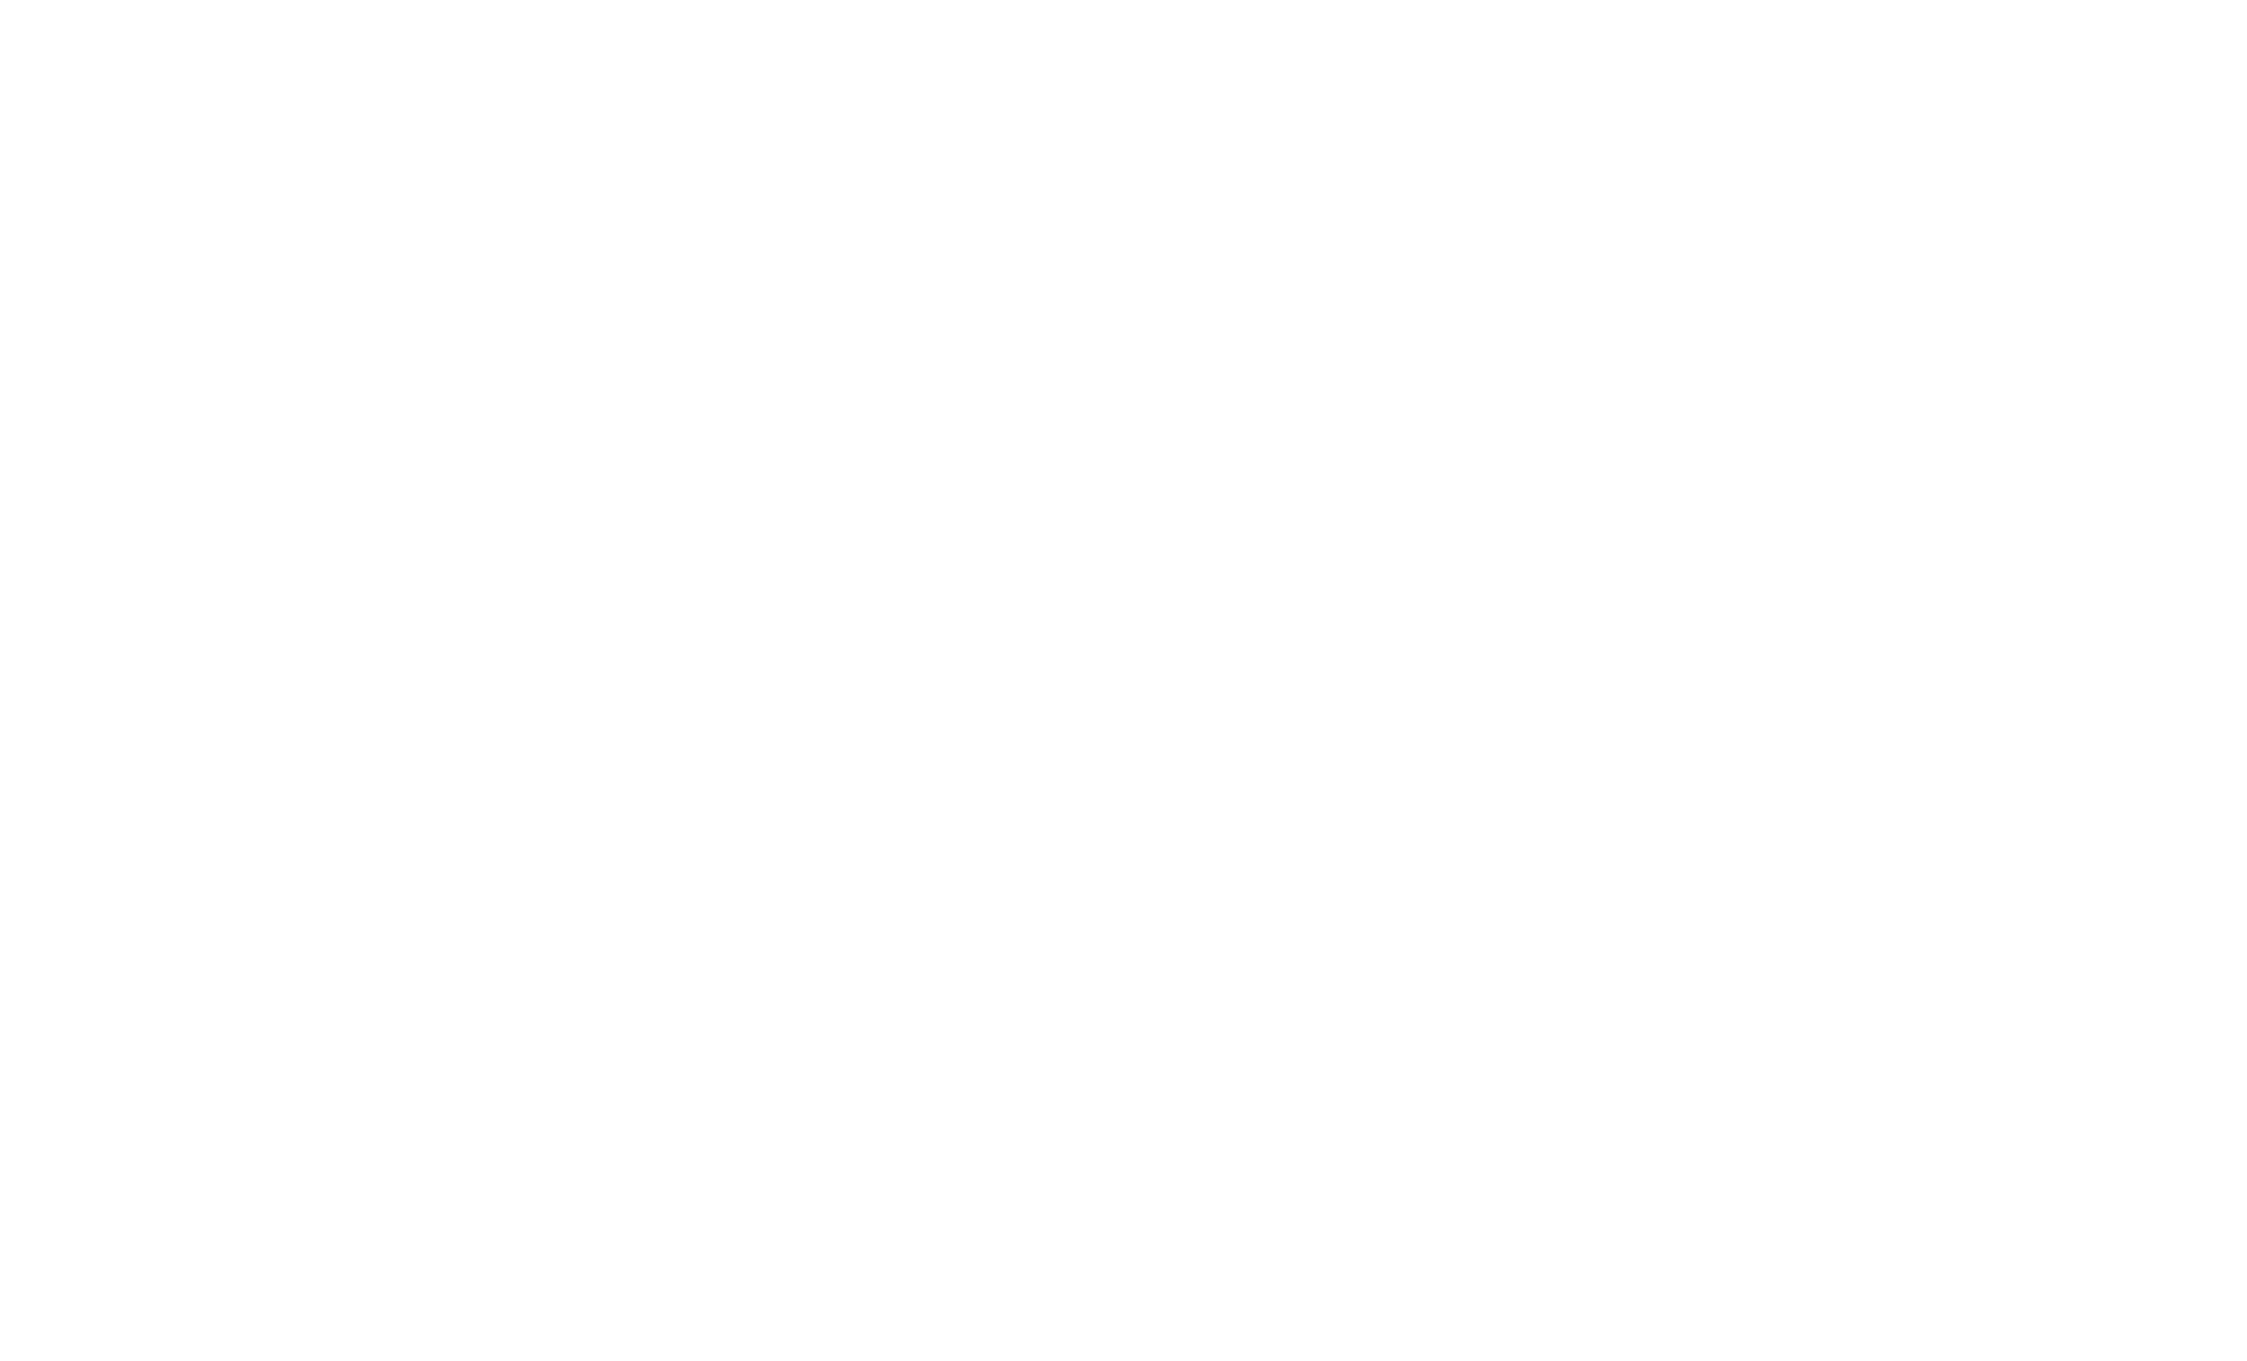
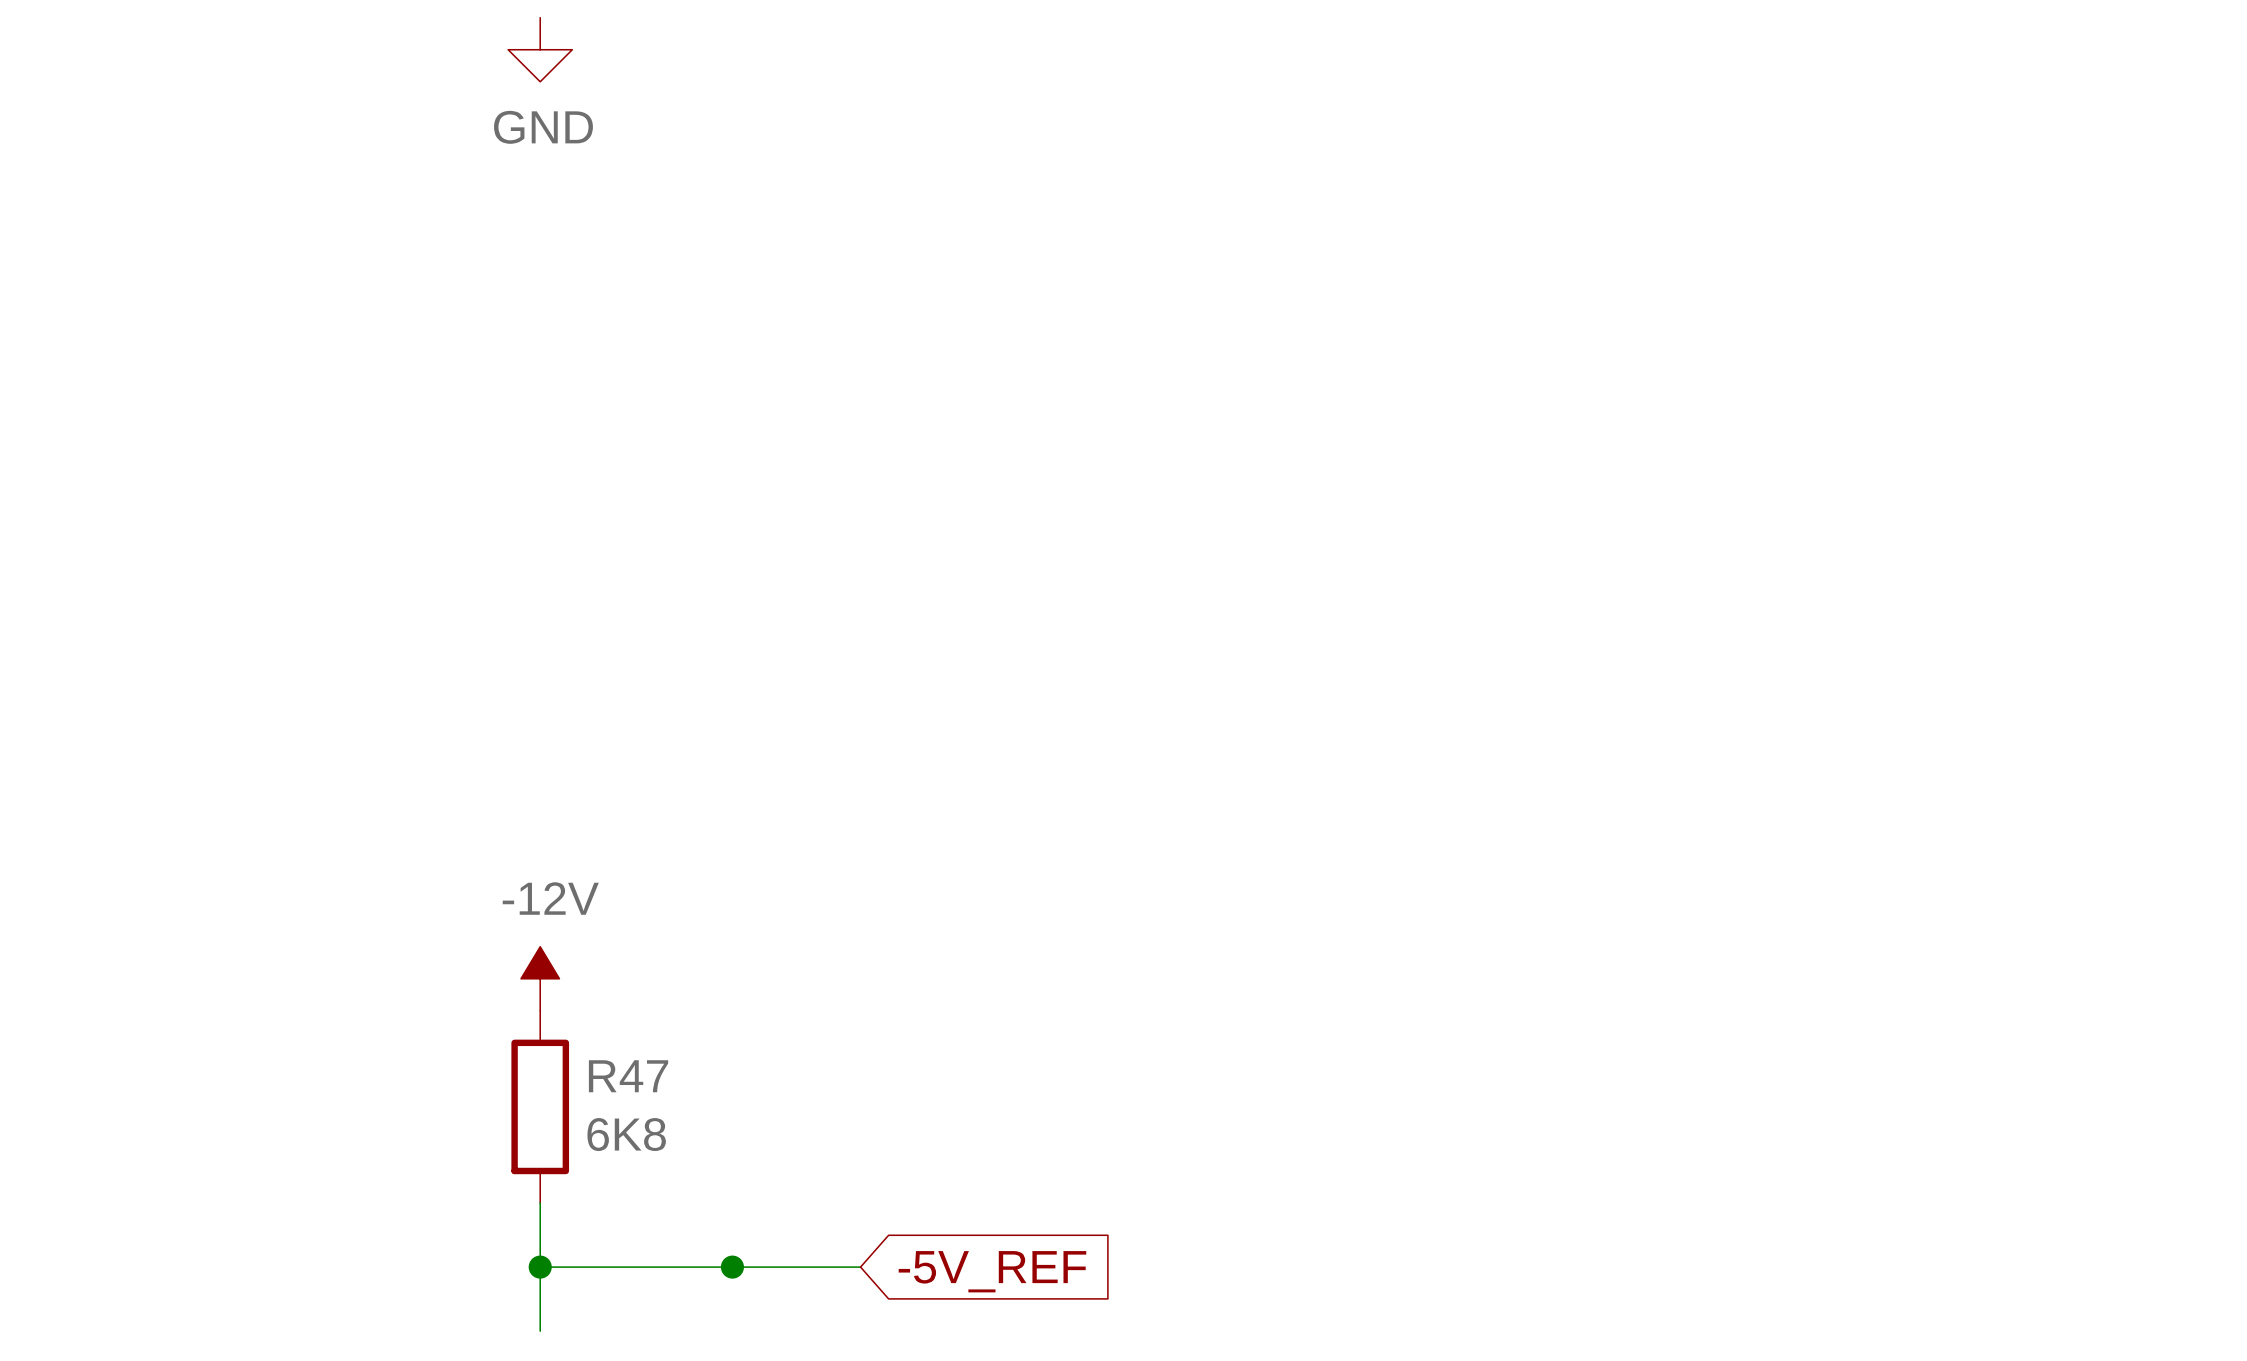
power symbol: none -> GND (540, 49)
power symbol: none -> -12V (540, 978)
R47: none -> 6K8 (540, 1106)
wire: none -> (540, 1203) (540, 1331)
wire: none -> (540, 1267) (860, 1267)
junction: none -> (540, 1267)
junction: none -> (732, 1267)
global label: none -> -5V_REF (992, 1271)

